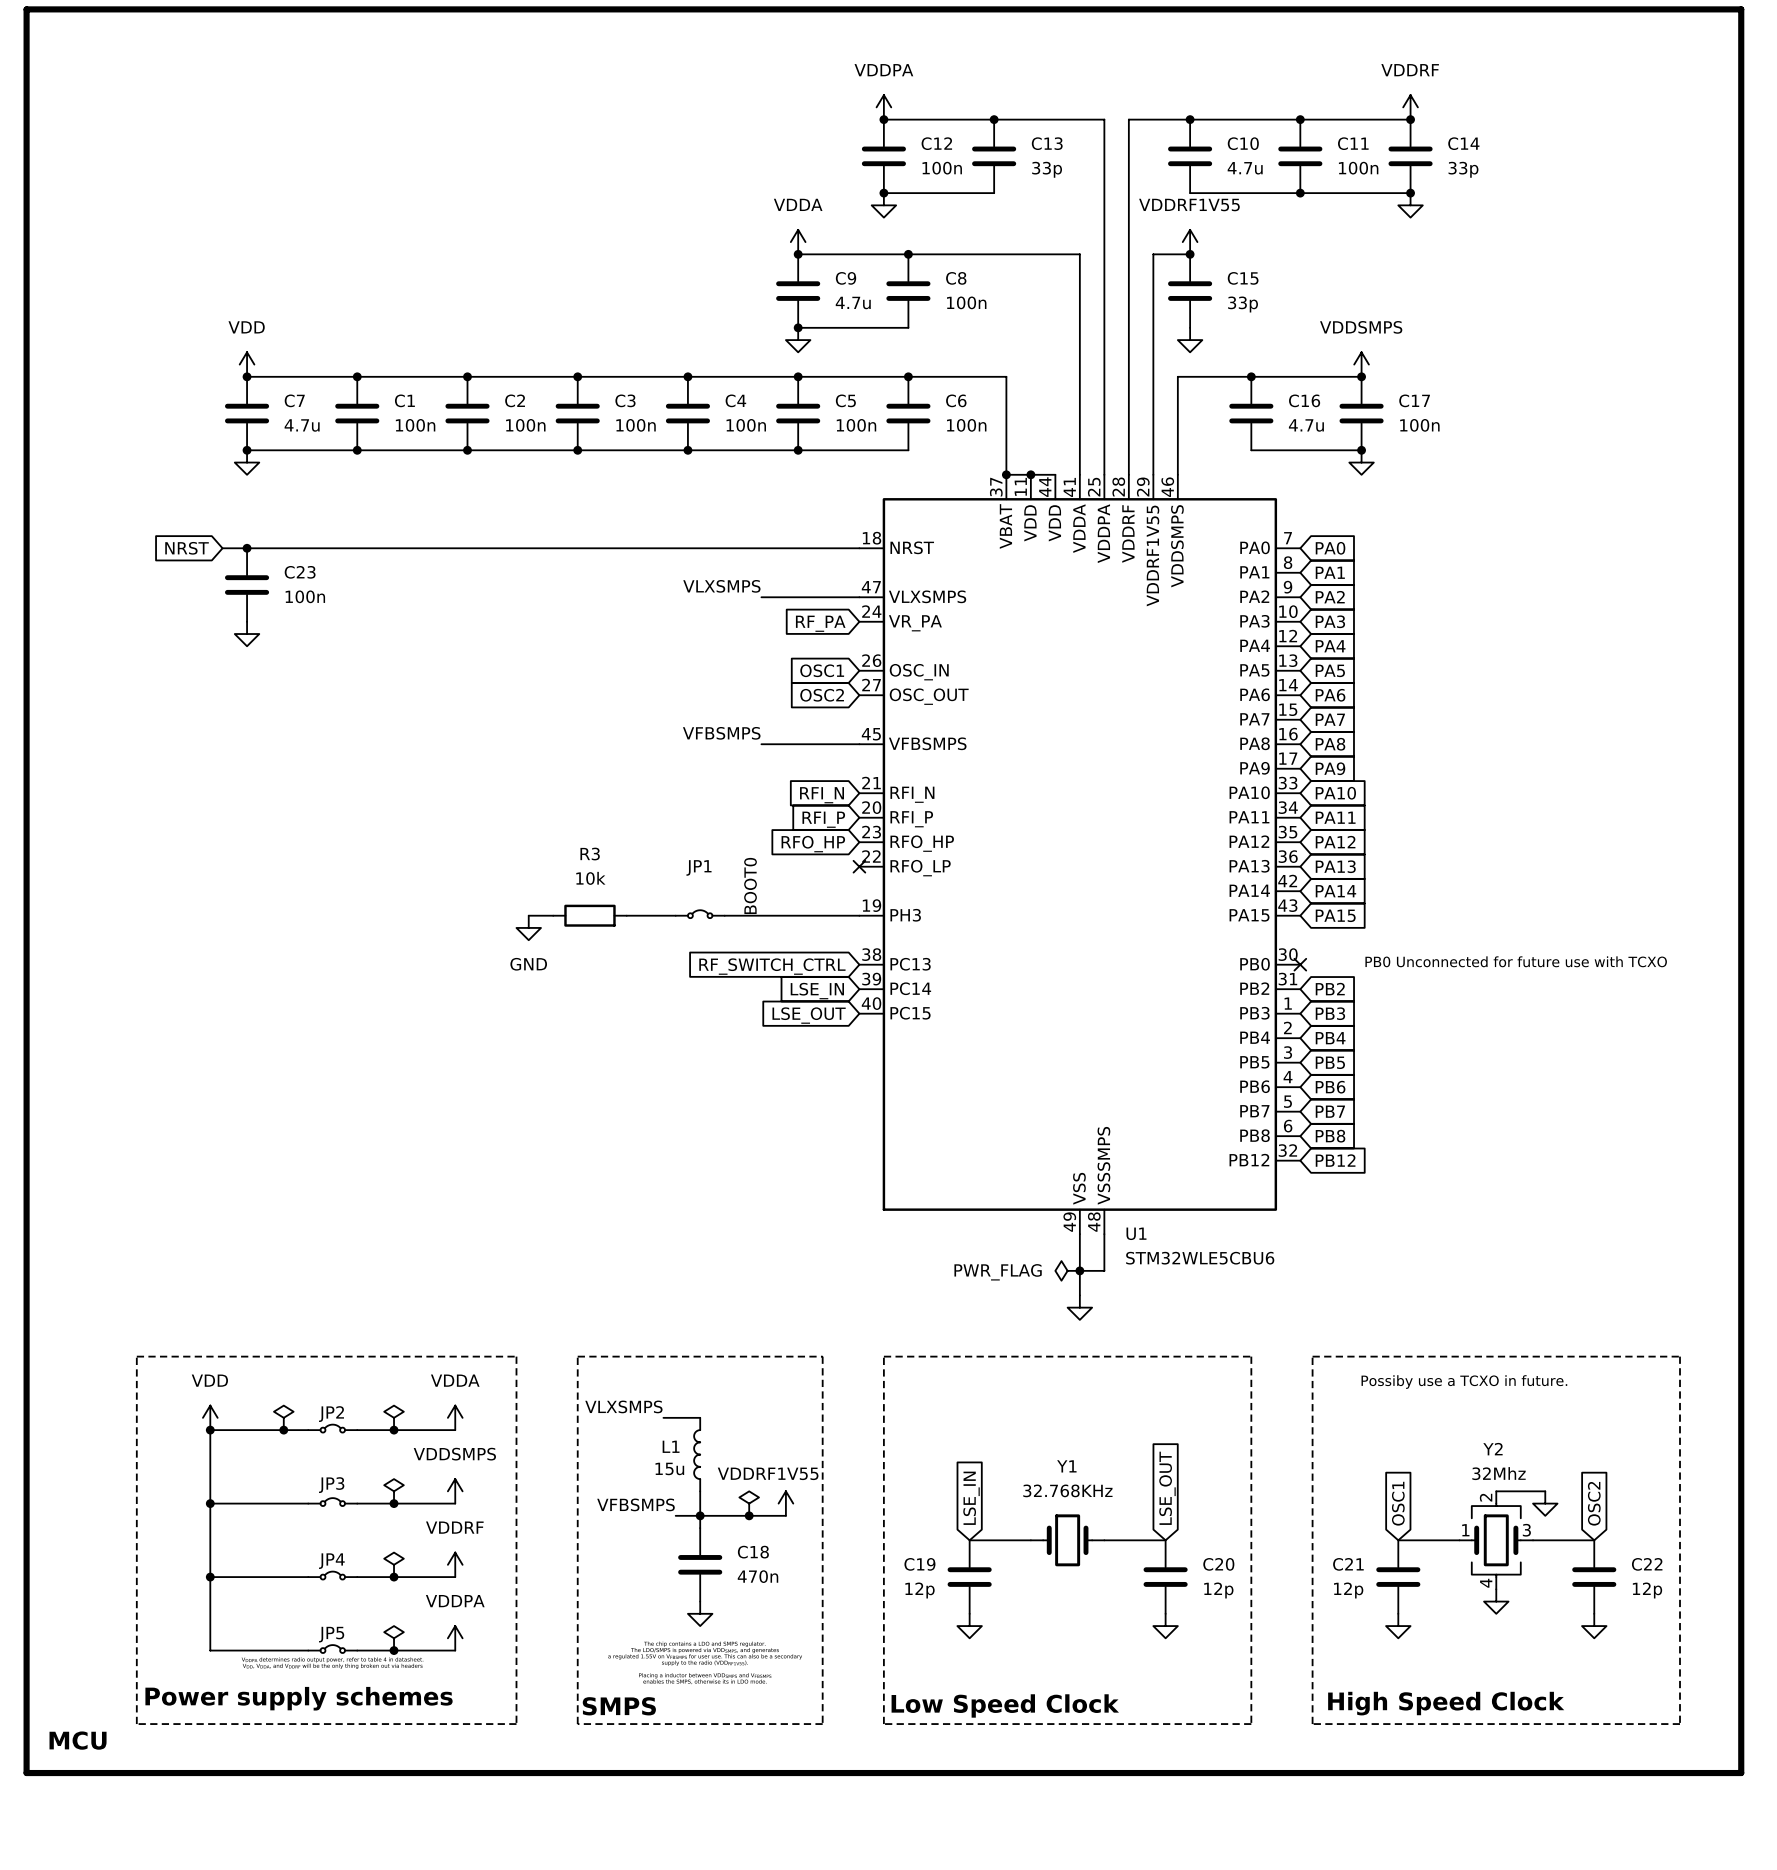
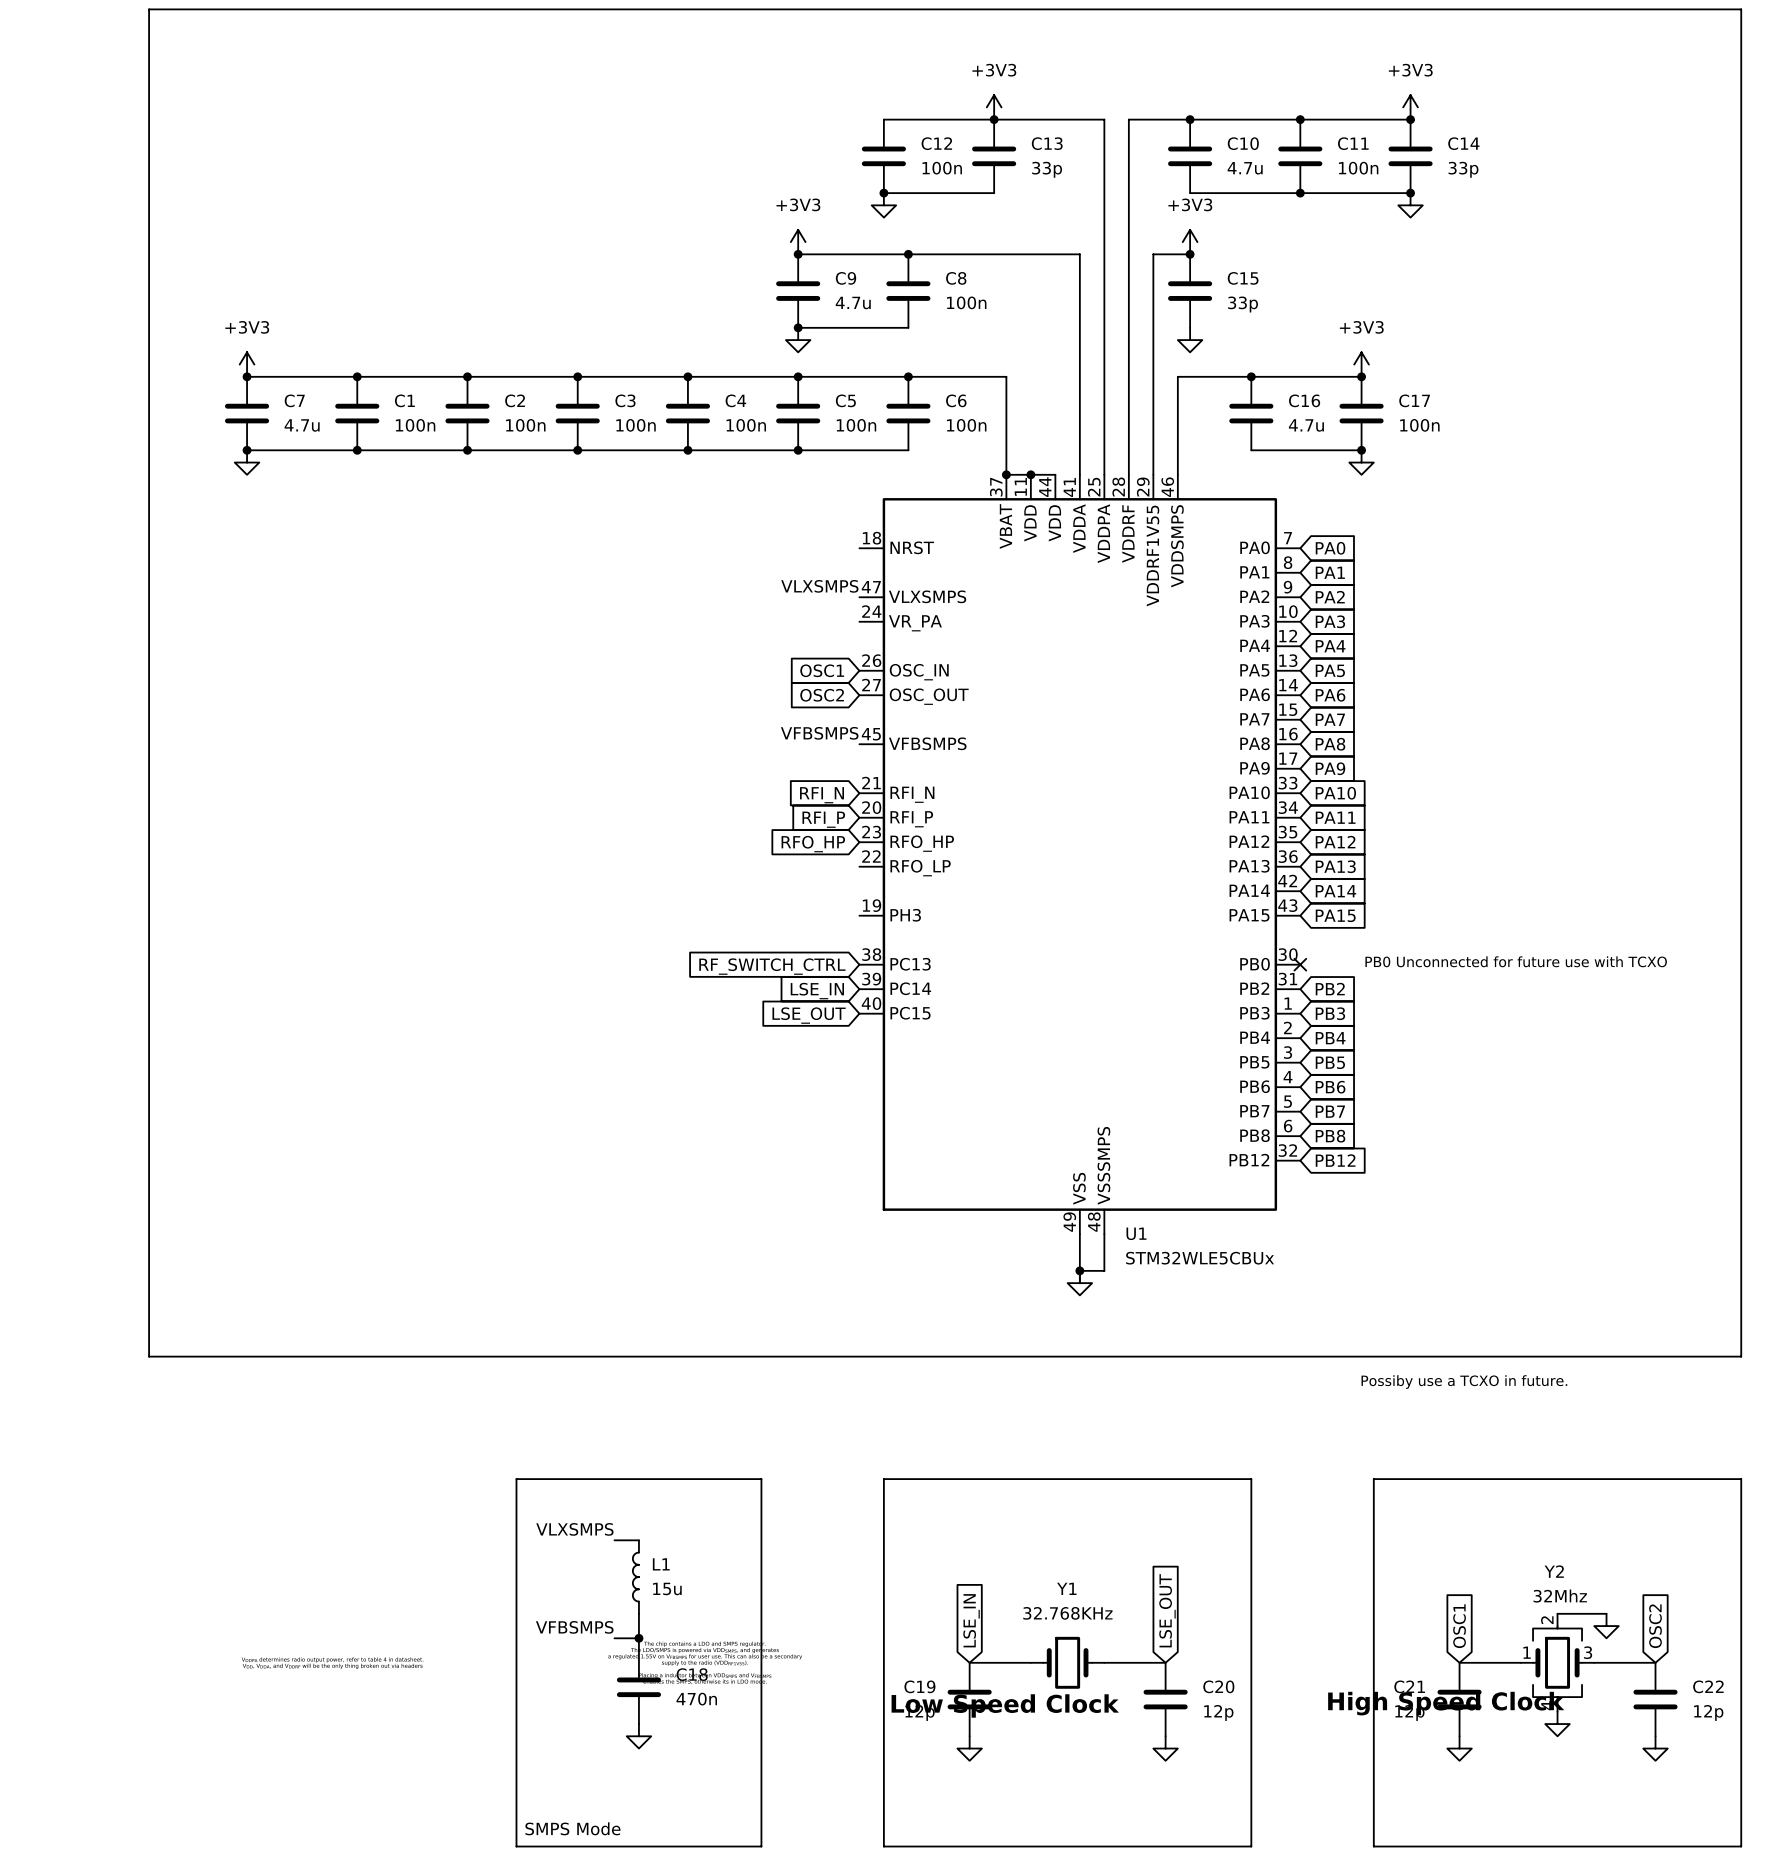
line: (149, 9) (26, 9) (26, 1773) (1741, 1773) -> (149, 9) (149, 1356) (1741, 1356)
line width: thick (149, 9) (1741, 9) (1741, 1356) -> thin (149, 9) (1741, 9) (1741, 1356)
power symbol: VDDPA (883, 107) -> none
power symbol: none -> +3V3 (994, 107)
power symbol: VDDRF (1410, 107) -> +3V3 (1410, 107)
junction: (883, 119) -> none
power symbol: VDDA (798, 242) -> +3V3 (798, 242)
power symbol: VDDRF1V55 (1190, 242) -> +3V3 (1190, 242)
power symbol: VDD (247, 364) -> +3V3 (247, 364)
power symbol: VDDSMPS (1361, 364) -> +3V3 (1361, 364)
global label: NRST (187, 548) -> none
wire: (222, 548) (859, 548) -> none
junction: (247, 548) -> none
C23: 100n (247, 585) -> none
label position: VLXSMPS (721, 586) -> VLXSMPS (819, 586)
wire: (761, 597) (859, 597) -> none
global label: RF_PA (820, 623) -> none
power symbol: (247, 634) -> none
label position: VFBSMPS (721, 733) -> VFBSMPS (819, 733)
wire: (761, 744) (859, 744) -> none
no-connect mark: (859, 866) -> none
label: BOOT0 (750, 885) -> none
JP1: (700, 914) -> none
wire: (528, 915) (553, 915) -> none
R3: 10k (589, 915) -> none
wire: (626, 915) (675, 915) -> none
wire: (724, 915) (859, 915) -> none
power symbol: GND (528, 927) -> none
U1 value: STM32WLE5CBU6 (1200, 1258) -> STM32WLE5CBUx (1200, 1258)
power symbol: PWR_FLAG (1067, 1270) -> none
wire: (1079, 1283) (1079, 1295) -> none
power symbol position: (1079, 1307) -> (1079, 1283)
line: (136, 1356) (516, 1356) (516, 1724) (136, 1724) (136, 1356) -> none
line: (577, 1356) (822, 1356) (822, 1724) (577, 1724) (577, 1356) -> (516, 1479) (761, 1479) (761, 1846) (516, 1846) (516, 1479)
line: (883, 1356) (1251, 1356) (1251, 1724) (883, 1724) (883, 1356) -> (883, 1479) (1251, 1479) (1251, 1846) (883, 1846) (883, 1479)
line: (1312, 1356) (1680, 1356) (1680, 1724) (1312, 1724) (1312, 1356) -> none
line: (1741, 1356) (1741, 1479) -> (1741, 1773) (1741, 1846) (1373, 1846) (1373, 1479) (1741, 1479)
label position: VLXSMPS (623, 1406) -> VLXSMPS (574, 1529)
power symbol: VDD (210, 1417) -> none
power symbol: (283, 1417) -> none
power symbol: (394, 1417) -> none
power symbol: VDDA (455, 1417) -> none
wire: (663, 1417) (700, 1417) -> none
JP2: (332, 1428) -> none
junction: (210, 1430) -> none
junction: (283, 1430) -> none
wire: (308, 1430) (210, 1430) (210, 1650) (308, 1650) -> none
wire: (357, 1430) (455, 1430) -> none
junction: (394, 1430) -> none
L1 name position: L1 (671, 1446) -> L1 (661, 1564)
L1 position: (697, 1454) -> (635, 1577)
L1 value position: 15u (669, 1468) -> 15u (667, 1588)
line width: thick (1741, 1479) (1741, 1773) -> thin (1741, 1479) (1741, 1773)
global label position: LSE_OUT (1167, 1488) -> LSE_OUT (1167, 1610)
power symbol: (394, 1491) -> none
power symbol: VDDSMPS (455, 1491) -> none
wire: (700, 1491) (700, 1528) -> (638, 1613) (638, 1650)
wire: (1496, 1491) (1545, 1491) -> (1557, 1613) (1606, 1613)
global label position: LSE_IN (971, 1498) -> LSE_IN (971, 1620)
JP3: (332, 1502) -> none
wire: (210, 1503) (308, 1503) -> none
junction: (210, 1503) -> none
wire: (357, 1503) (455, 1503) -> none
junction: (394, 1503) -> none
power symbol: (749, 1503) -> none
power symbol: VDDRF1V55 (785, 1503) -> none
global label position: OSC1 (1398, 1503) -> OSC1 (1459, 1626)
power symbol: (1545, 1503) -> none
global label position: OSC2 (1594, 1503) -> OSC2 (1655, 1626)
label position: VFBSMPS (635, 1504) -> VFBSMPS (574, 1627)
wire: (675, 1515) (785, 1515) -> none
junction: (700, 1515) -> none
junction: (749, 1515) -> none
wire: none -> (614, 1540) (638, 1540)
wire: (969, 1540) (1030, 1540) -> (969, 1662) (1030, 1662)
Y1 position: (1067, 1540) -> (1067, 1662)
wire: (1104, 1540) (1165, 1540) -> (1104, 1662) (1165, 1662)
wire: (1398, 1540) (1459, 1540) -> (1459, 1662) (1520, 1662)
Y2 position: (1496, 1540) -> (1557, 1662)
wire: (1533, 1540) (1594, 1540) -> (1594, 1662) (1655, 1662)
power symbol: (394, 1564) -> none
power symbol: VDDRF (455, 1564) -> none
C18 position: (700, 1564) -> (638, 1687)
JP4: (332, 1575) -> none
wire: (210, 1577) (308, 1577) -> none
junction: (210, 1577) -> none
wire: (357, 1577) (455, 1577) -> none
junction: (394, 1577) -> none
C19 position: (969, 1577) -> (969, 1699)
C20 position: (1165, 1577) -> (1165, 1699)
C21 position: (1398, 1577) -> (1459, 1699)
C22 position: (1594, 1577) -> (1655, 1699)
power symbol: (1496, 1601) -> none
power symbol position: (700, 1613) -> (638, 1736)
power symbol: (969, 1626) -> none
power symbol: (1165, 1626) -> none
power symbol: (1398, 1626) -> none
power symbol position: (1594, 1626) -> (1606, 1626)
power symbol: (394, 1638) -> none
power symbol: VDDPA (455, 1638) -> none
wire: none -> (614, 1638) (638, 1638)
junction: none -> (638, 1638)
JP5: (332, 1649) -> none
wire: (357, 1650) (455, 1650) -> none
junction: (394, 1650) -> none
text: Power supply schemes (299, 1698) -> none
text: SMPS (619, 1706) -> none
power symbol: none -> (1557, 1724)
text: MCU (78, 1740) -> none
power symbol: none -> (969, 1748)
power symbol: none -> (1165, 1748)
power symbol: none -> (1459, 1748)
power symbol: none -> (1655, 1748)
text: none -> SMPS Mode (572, 1828)

